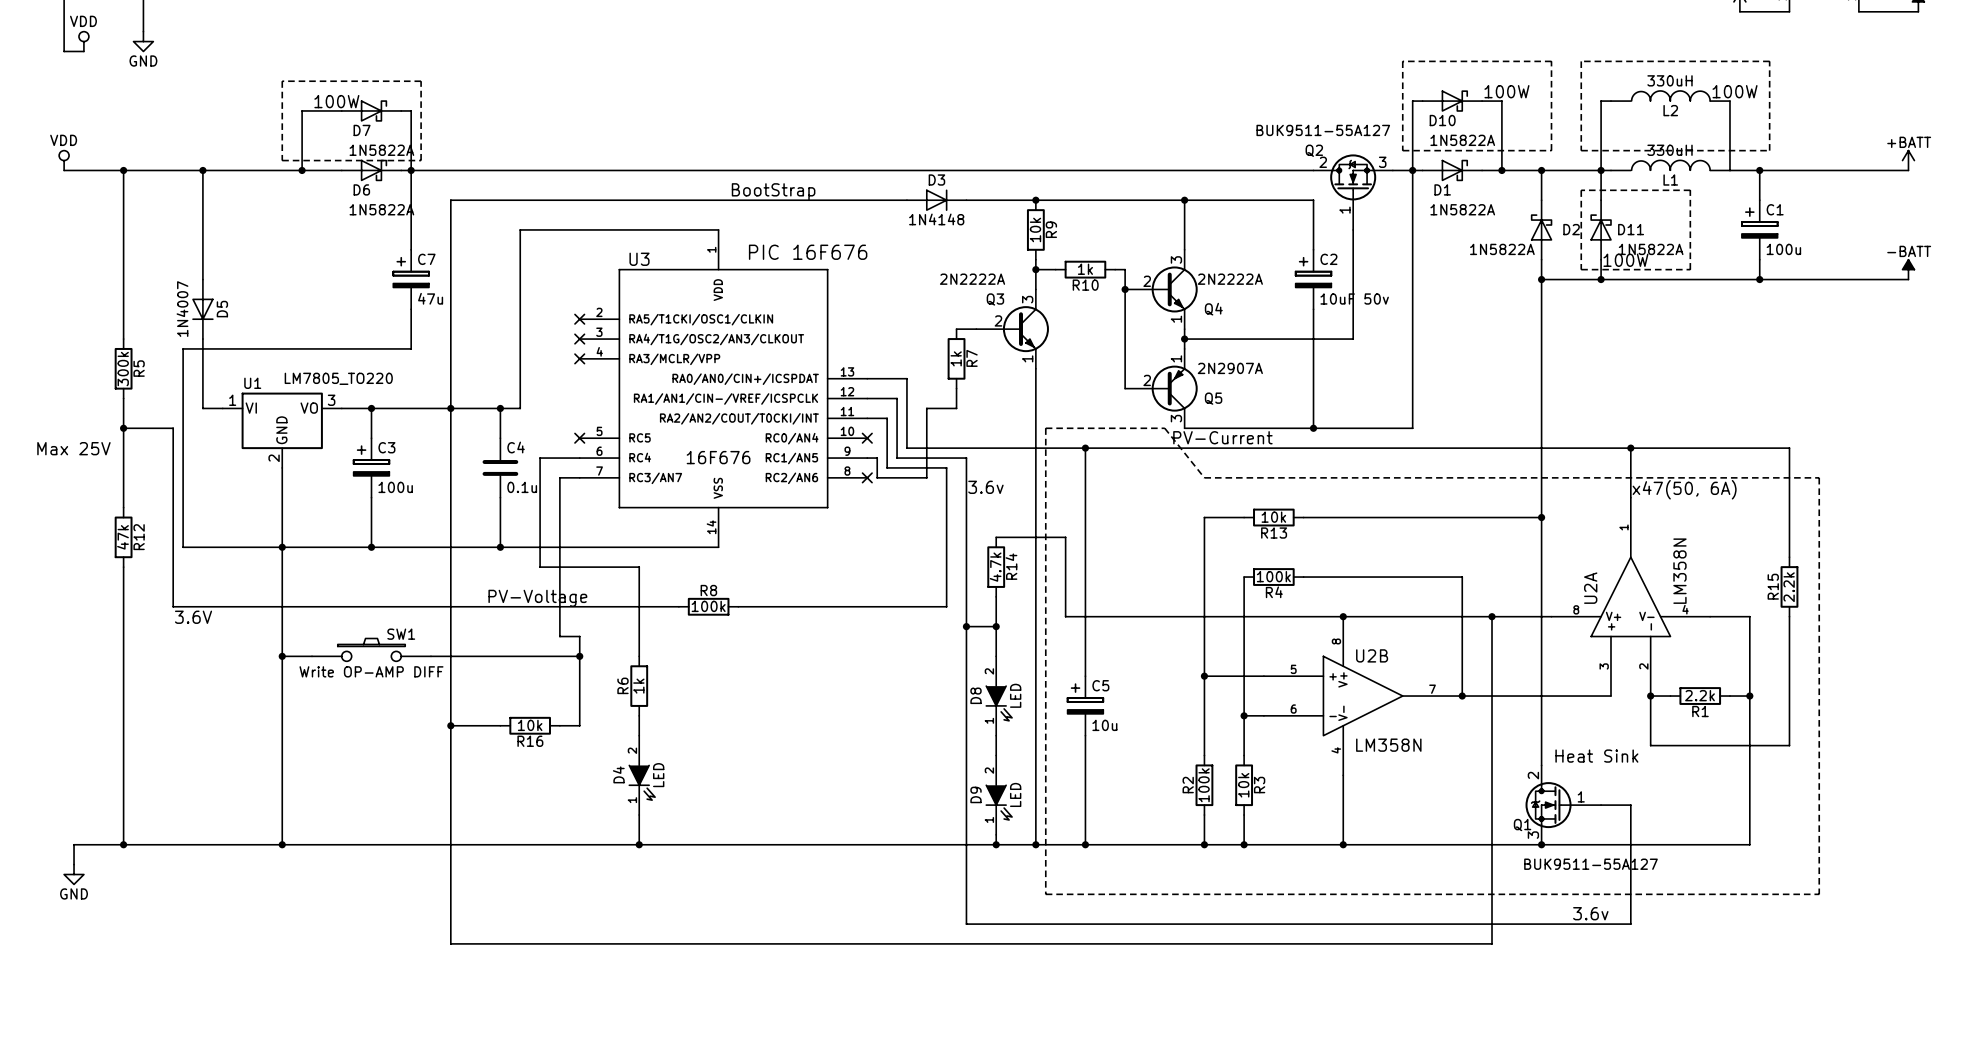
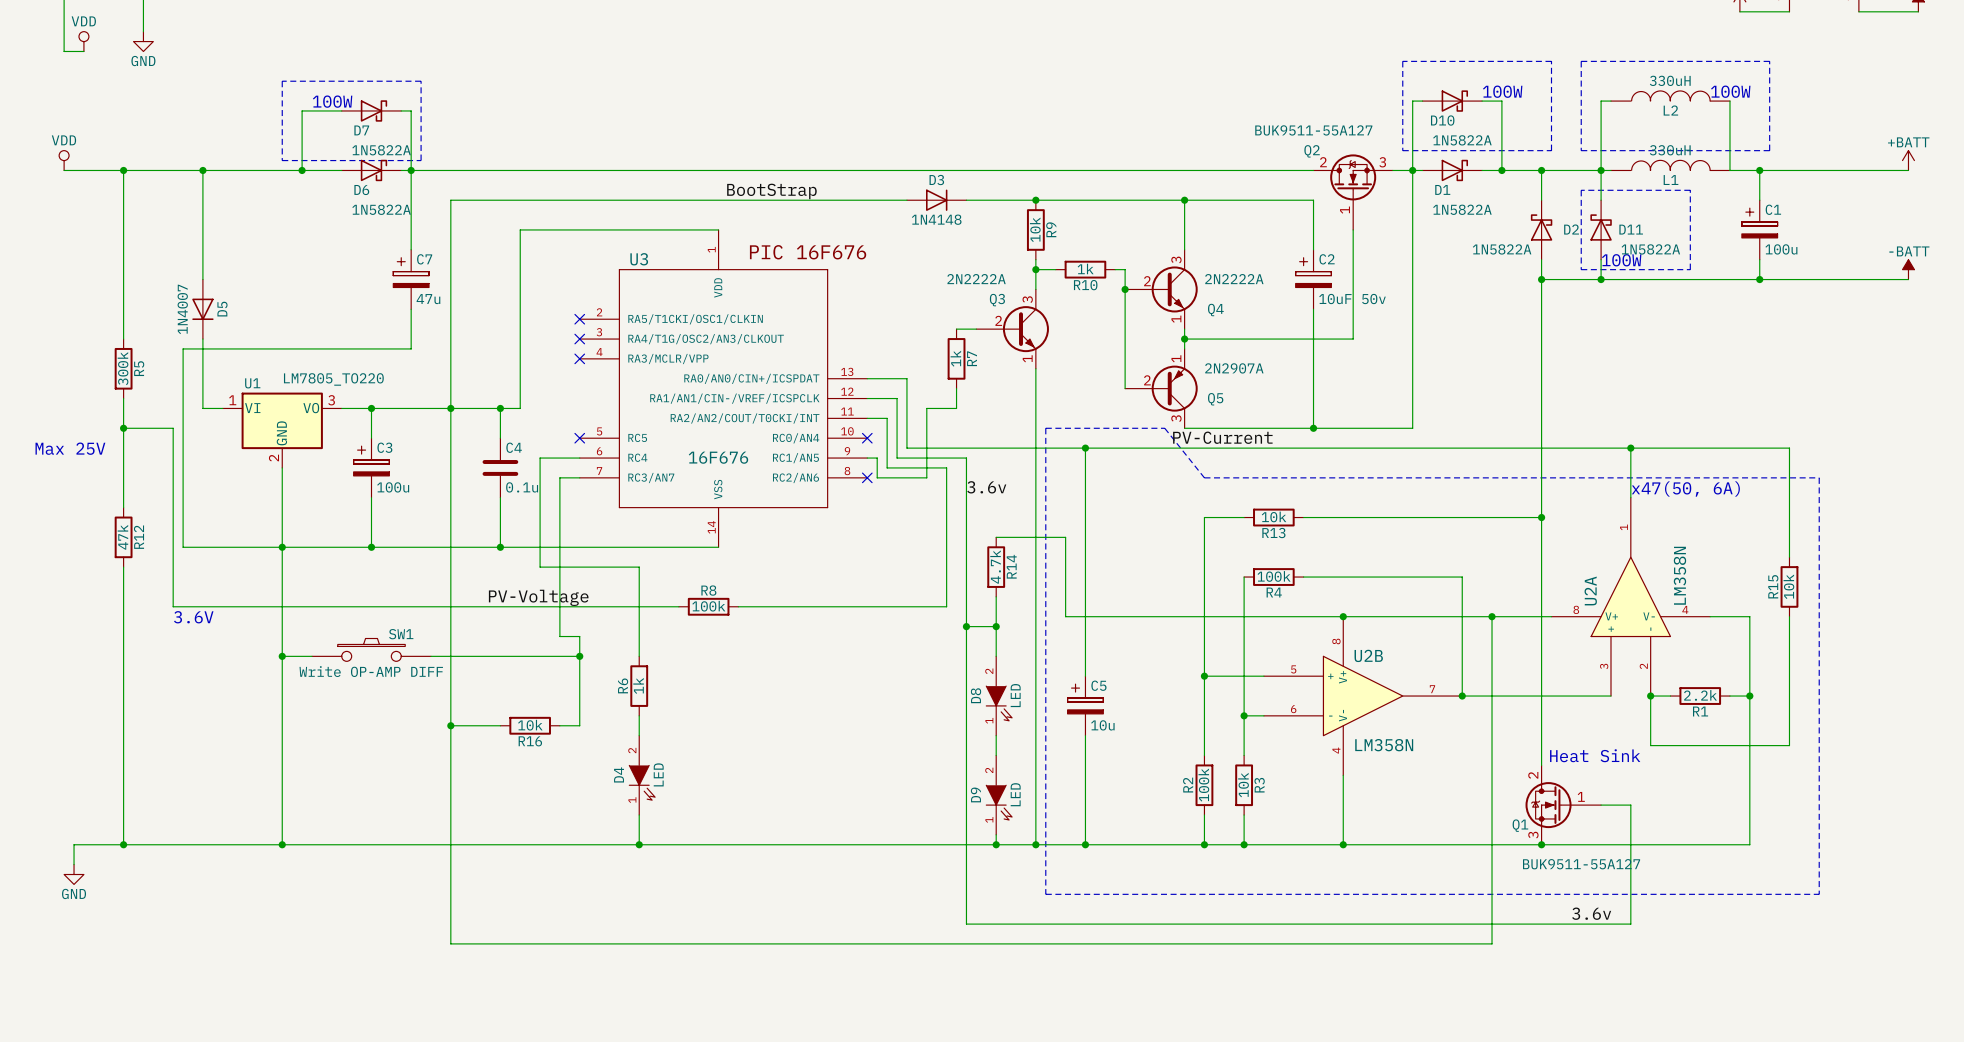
R15 value: 2.2k (1789, 587) -> 10k (1788, 586)

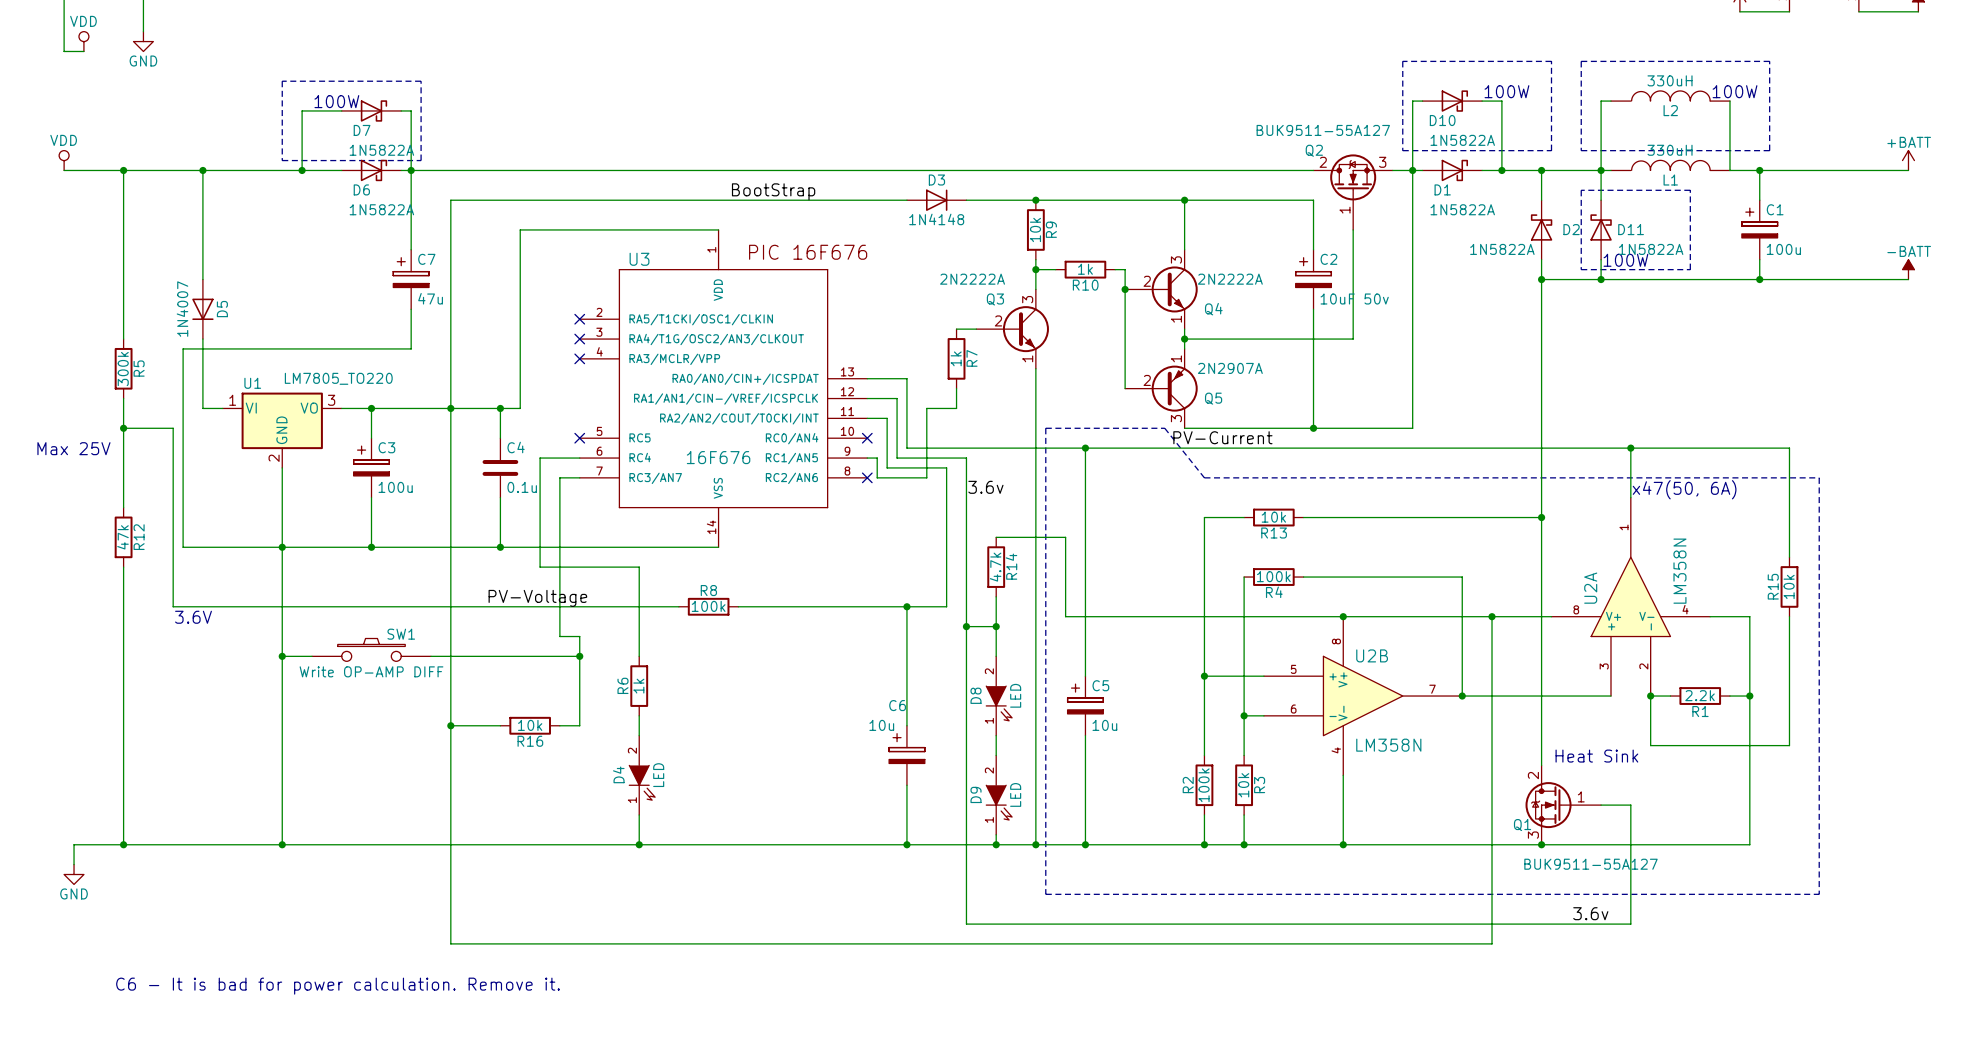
wire: none -> (906, 606) (906, 725)
junction: none -> (906, 606)
C6: none -> 10u (906, 755)
wire: none -> (906, 785) (906, 844)
junction: none -> (906, 844)
text: none -> C6 - It is bad for power calculation. Remove it. (338, 986)

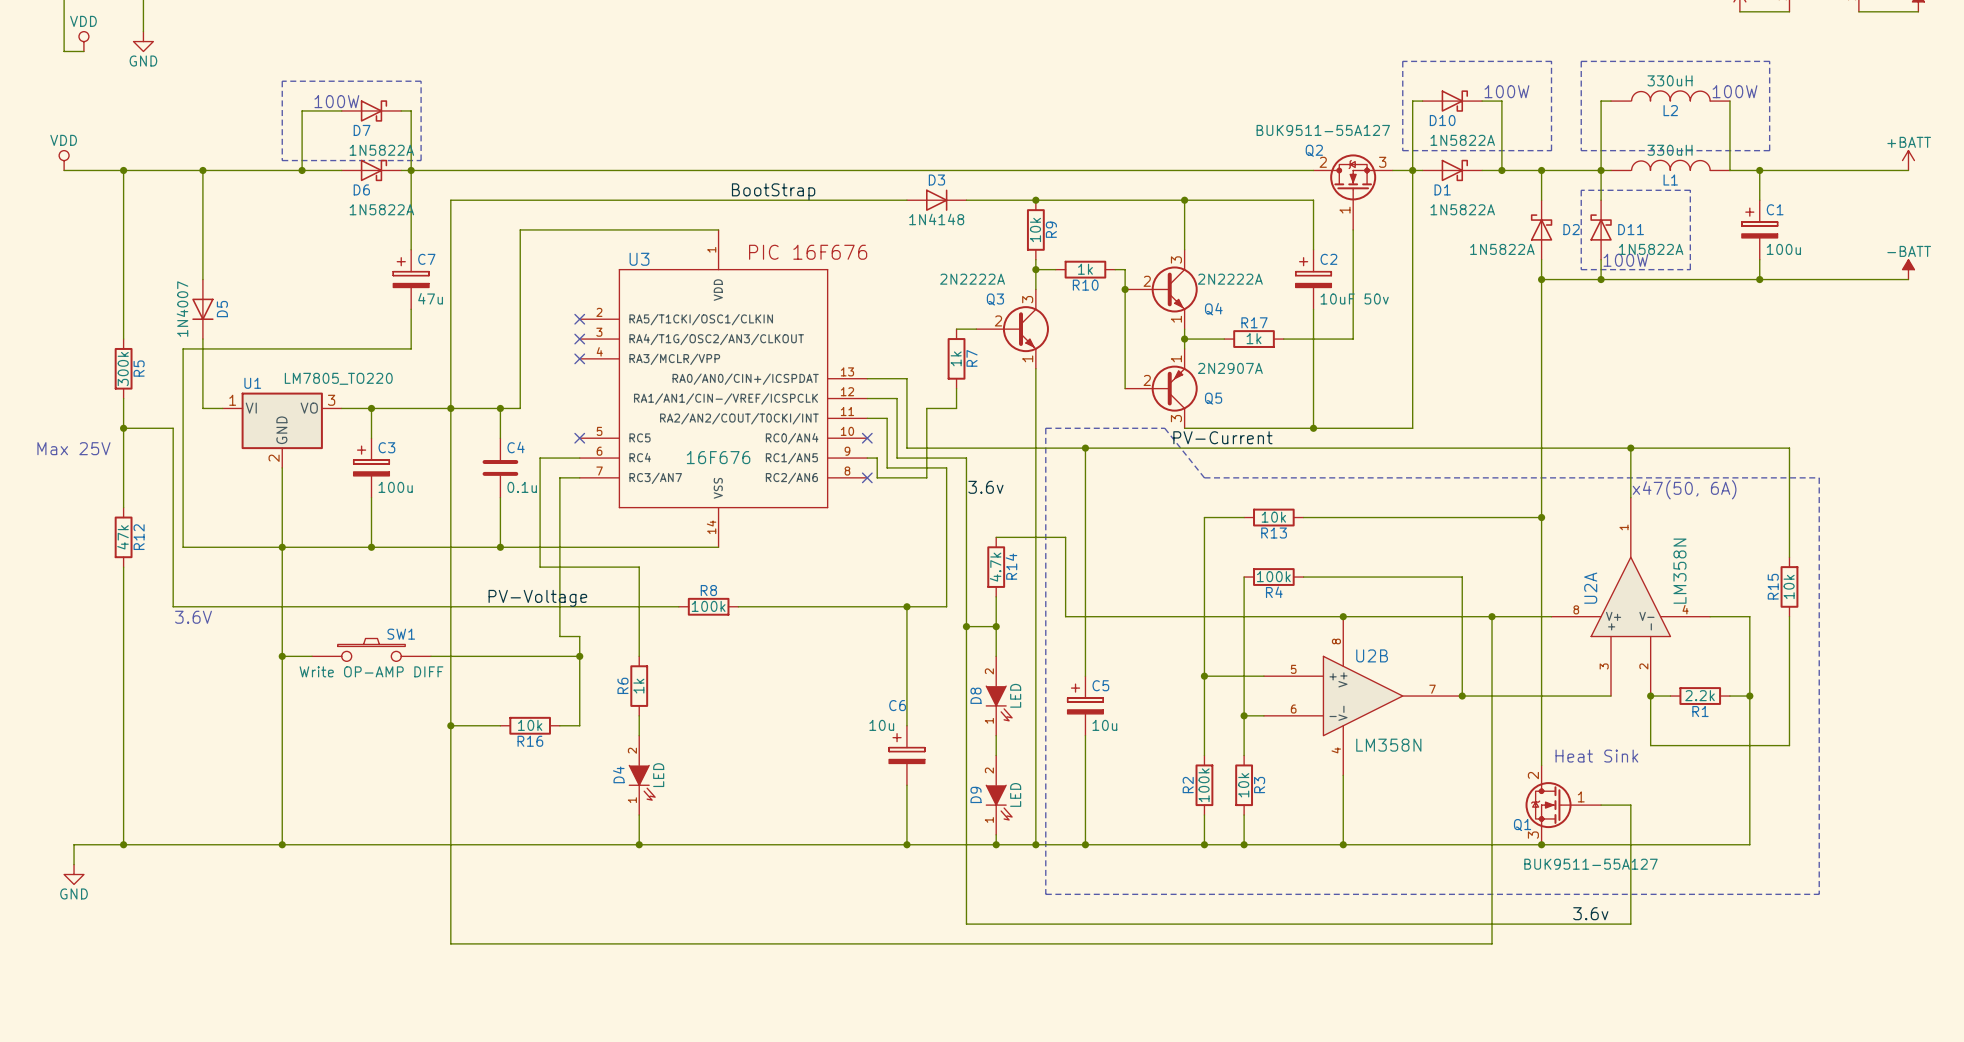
wire: (1224, 339) (1283, 339) -> none
R17: none -> 1k (1254, 339)
text: C6 - It is bad for power calculation. Remove it. (338, 986) -> none

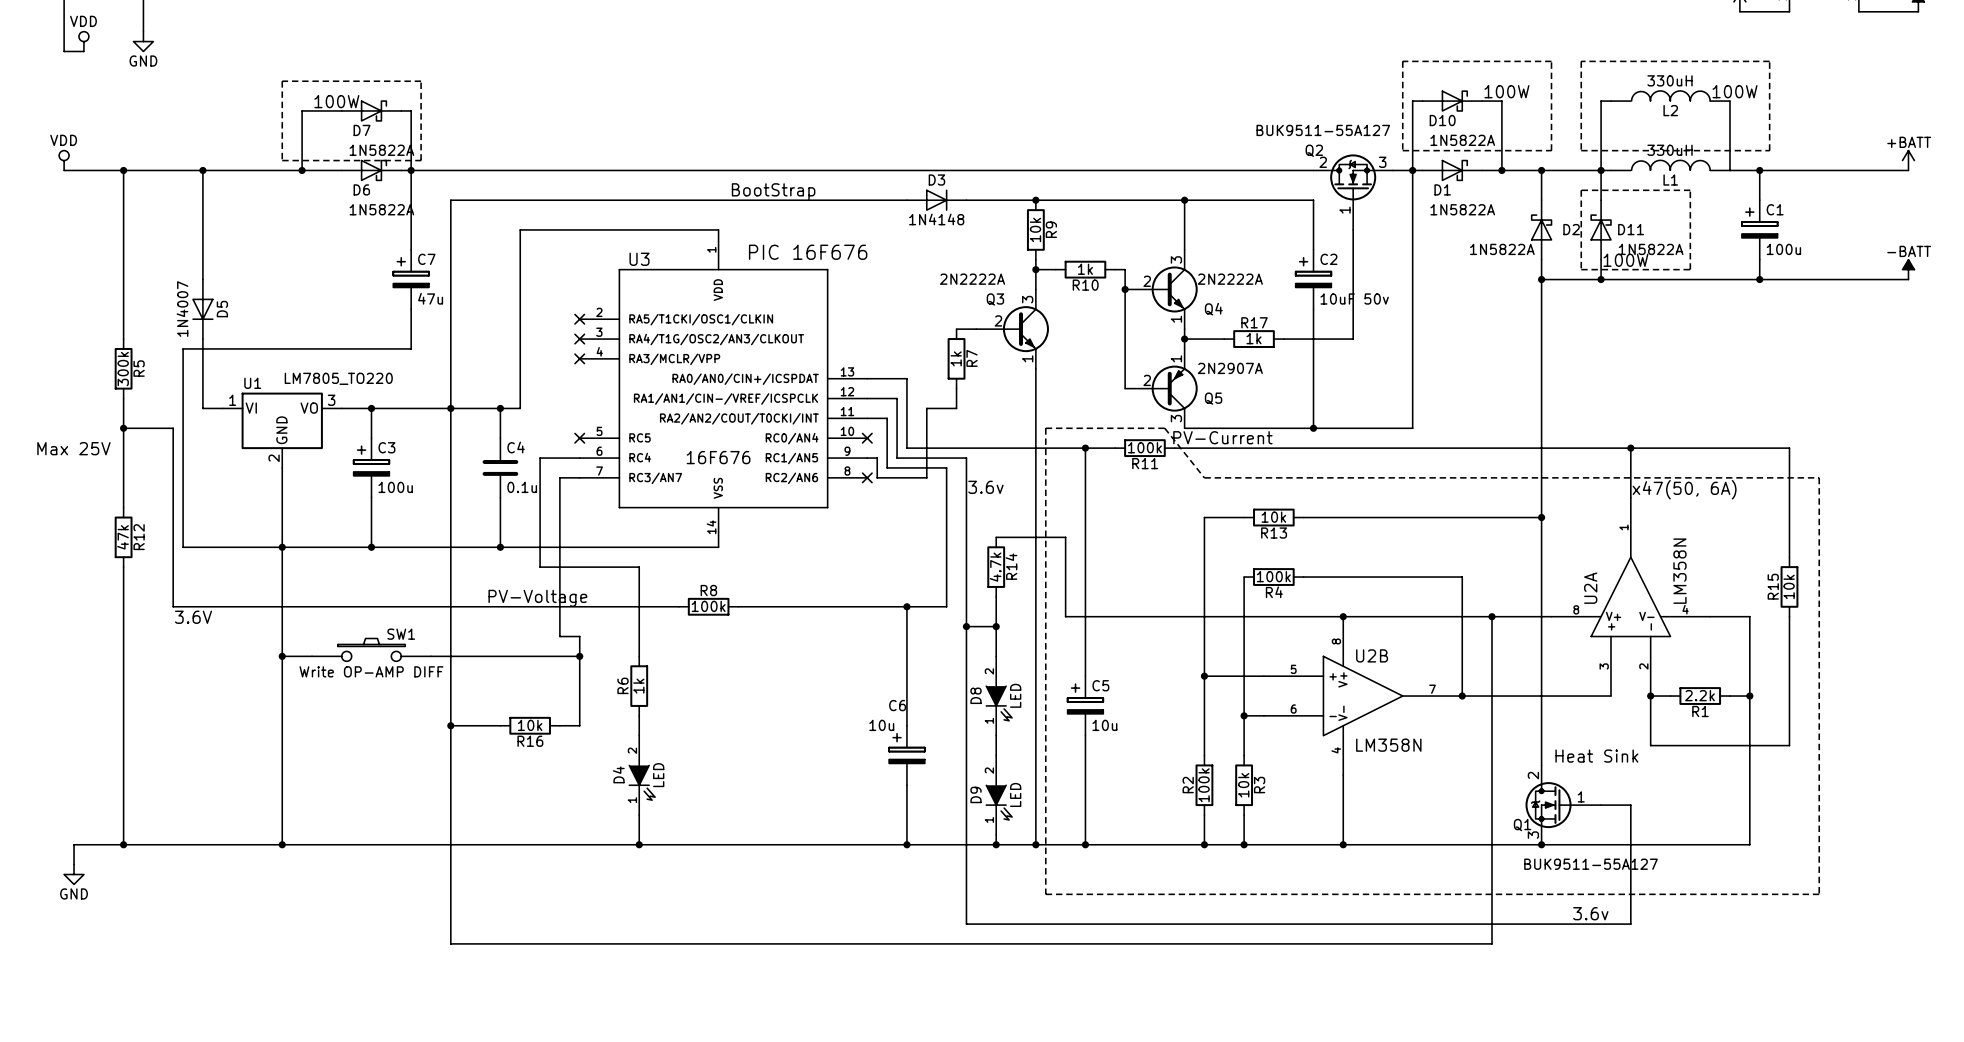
R11: none -> 100k (1144, 448)

